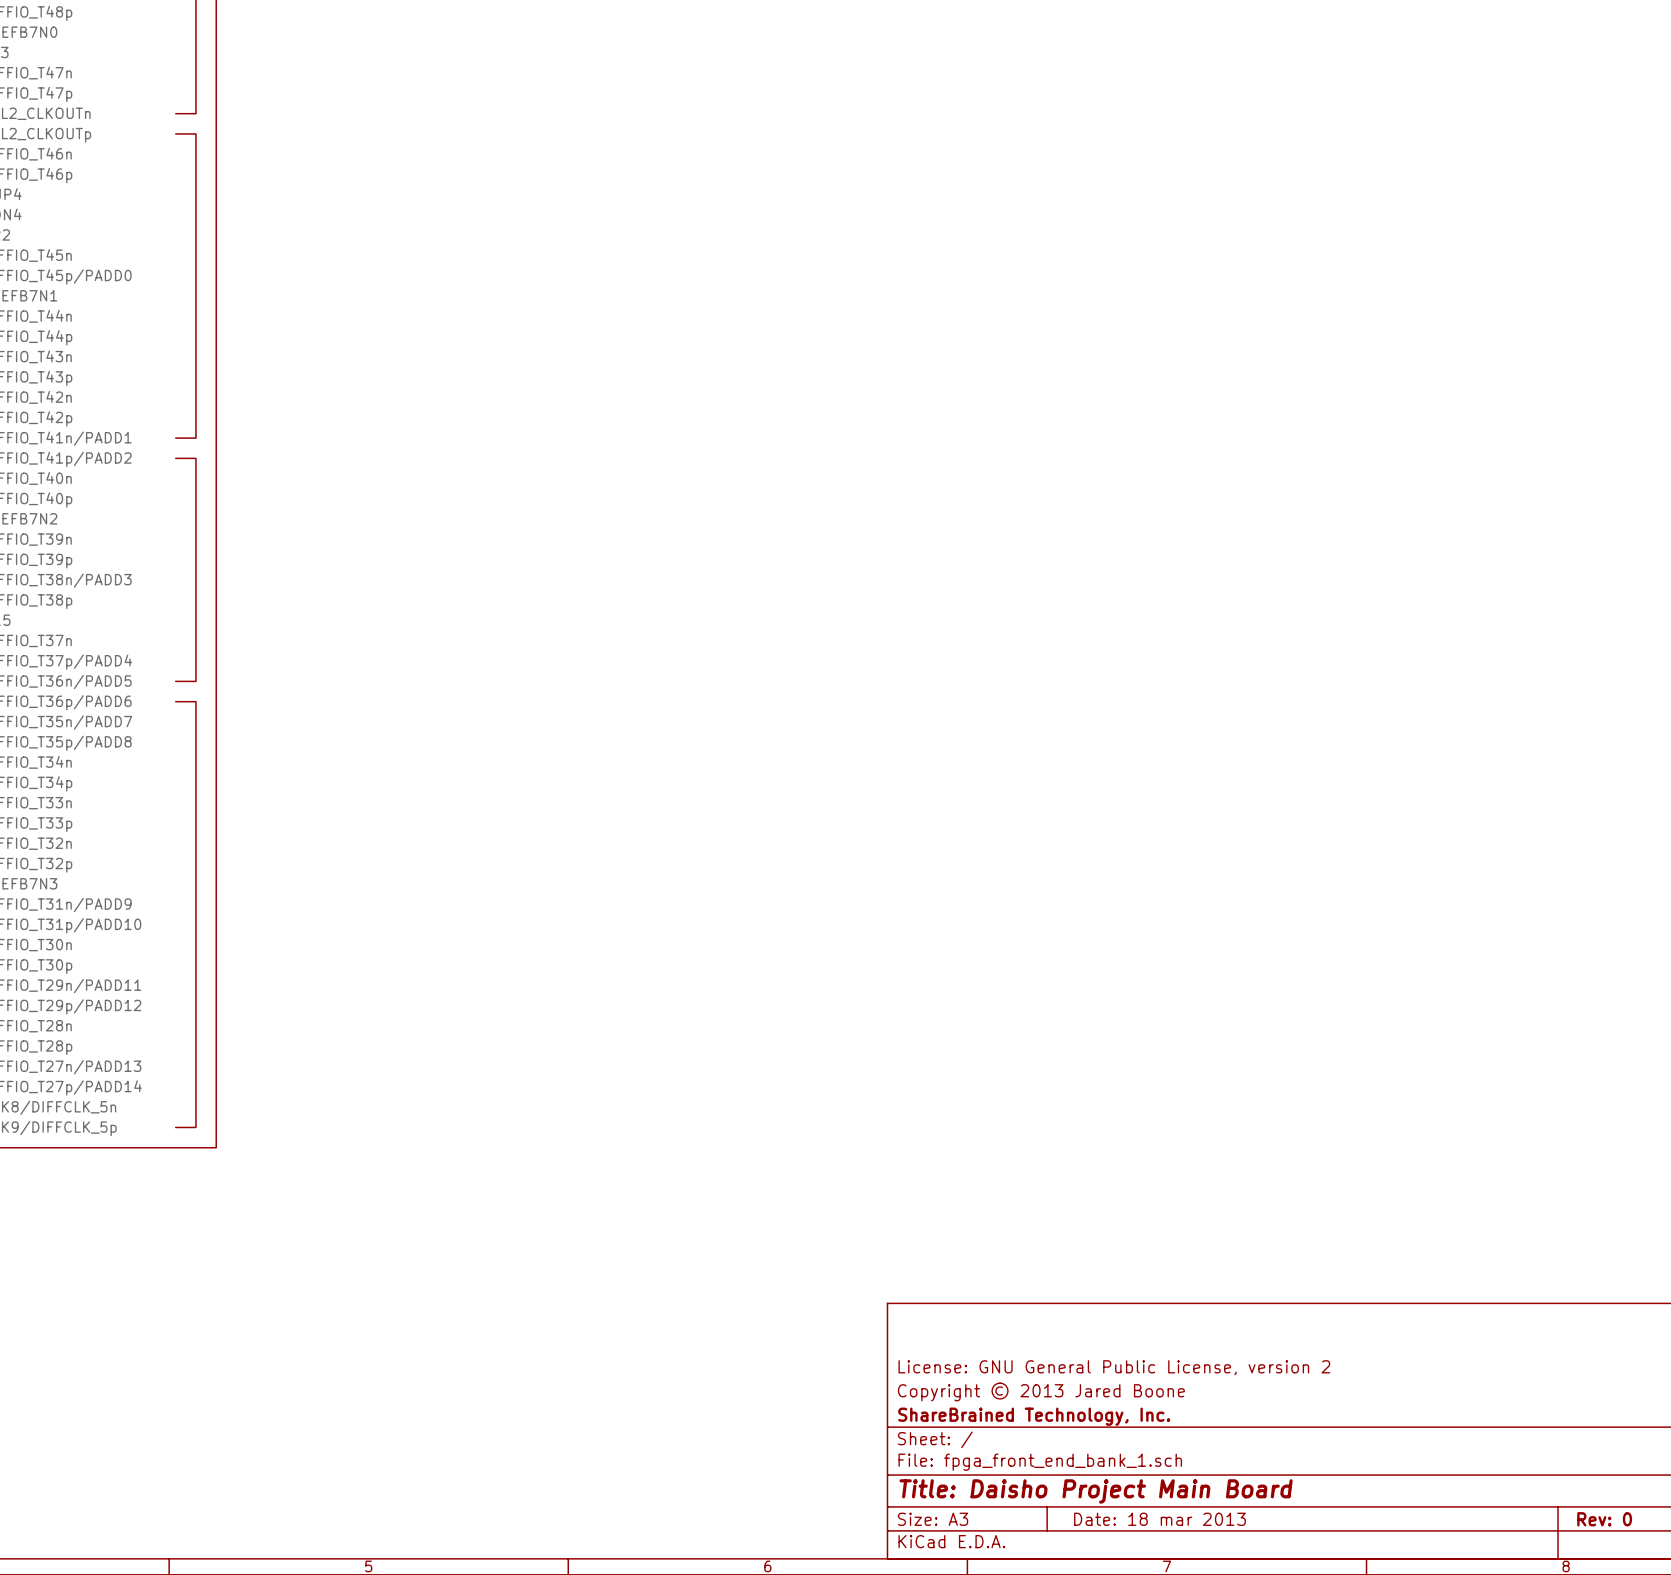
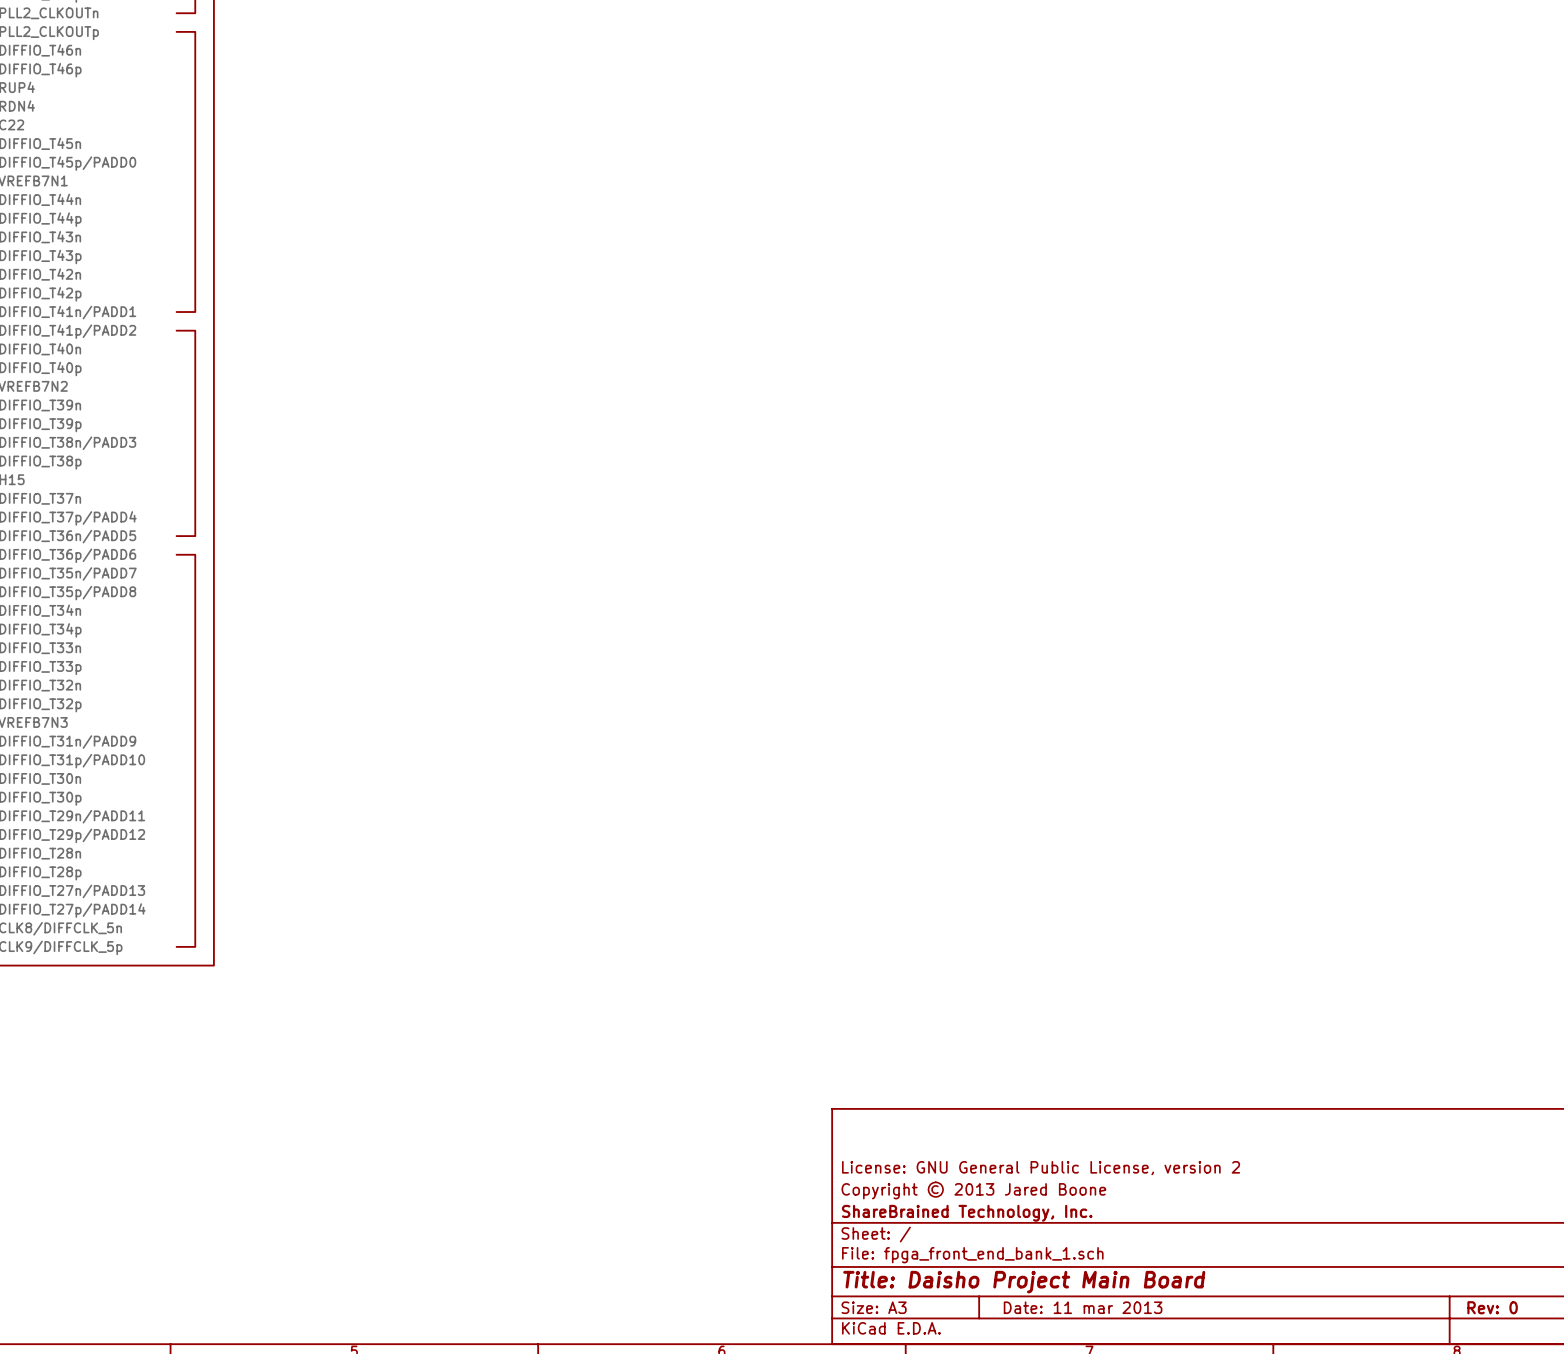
title block: Date: 18 mar 2013 (1159, 1519) -> Date: 11 mar 2013 (1083, 1307)

